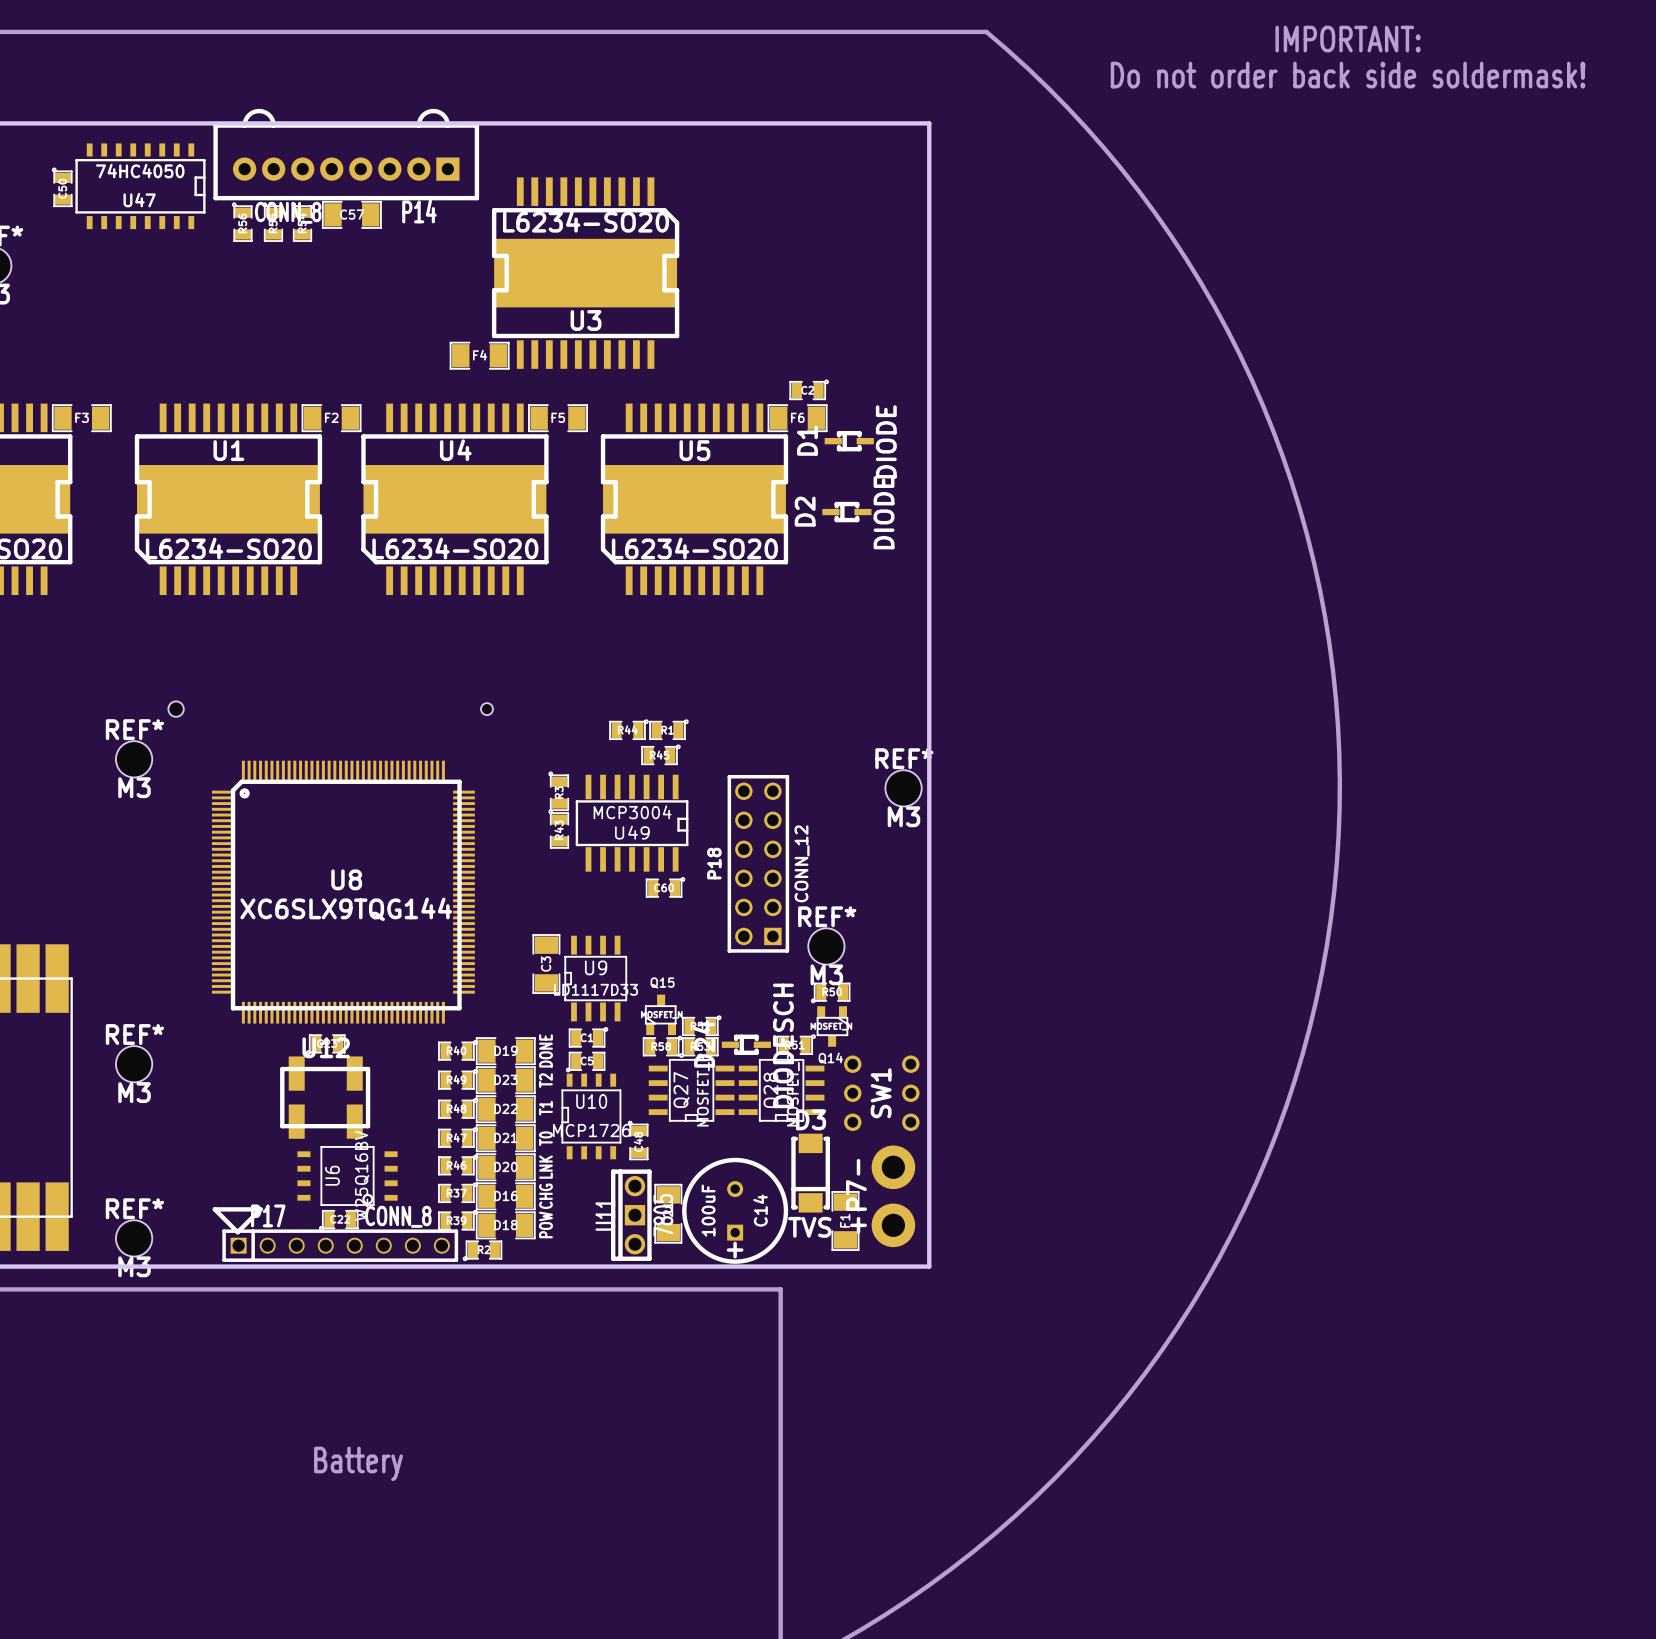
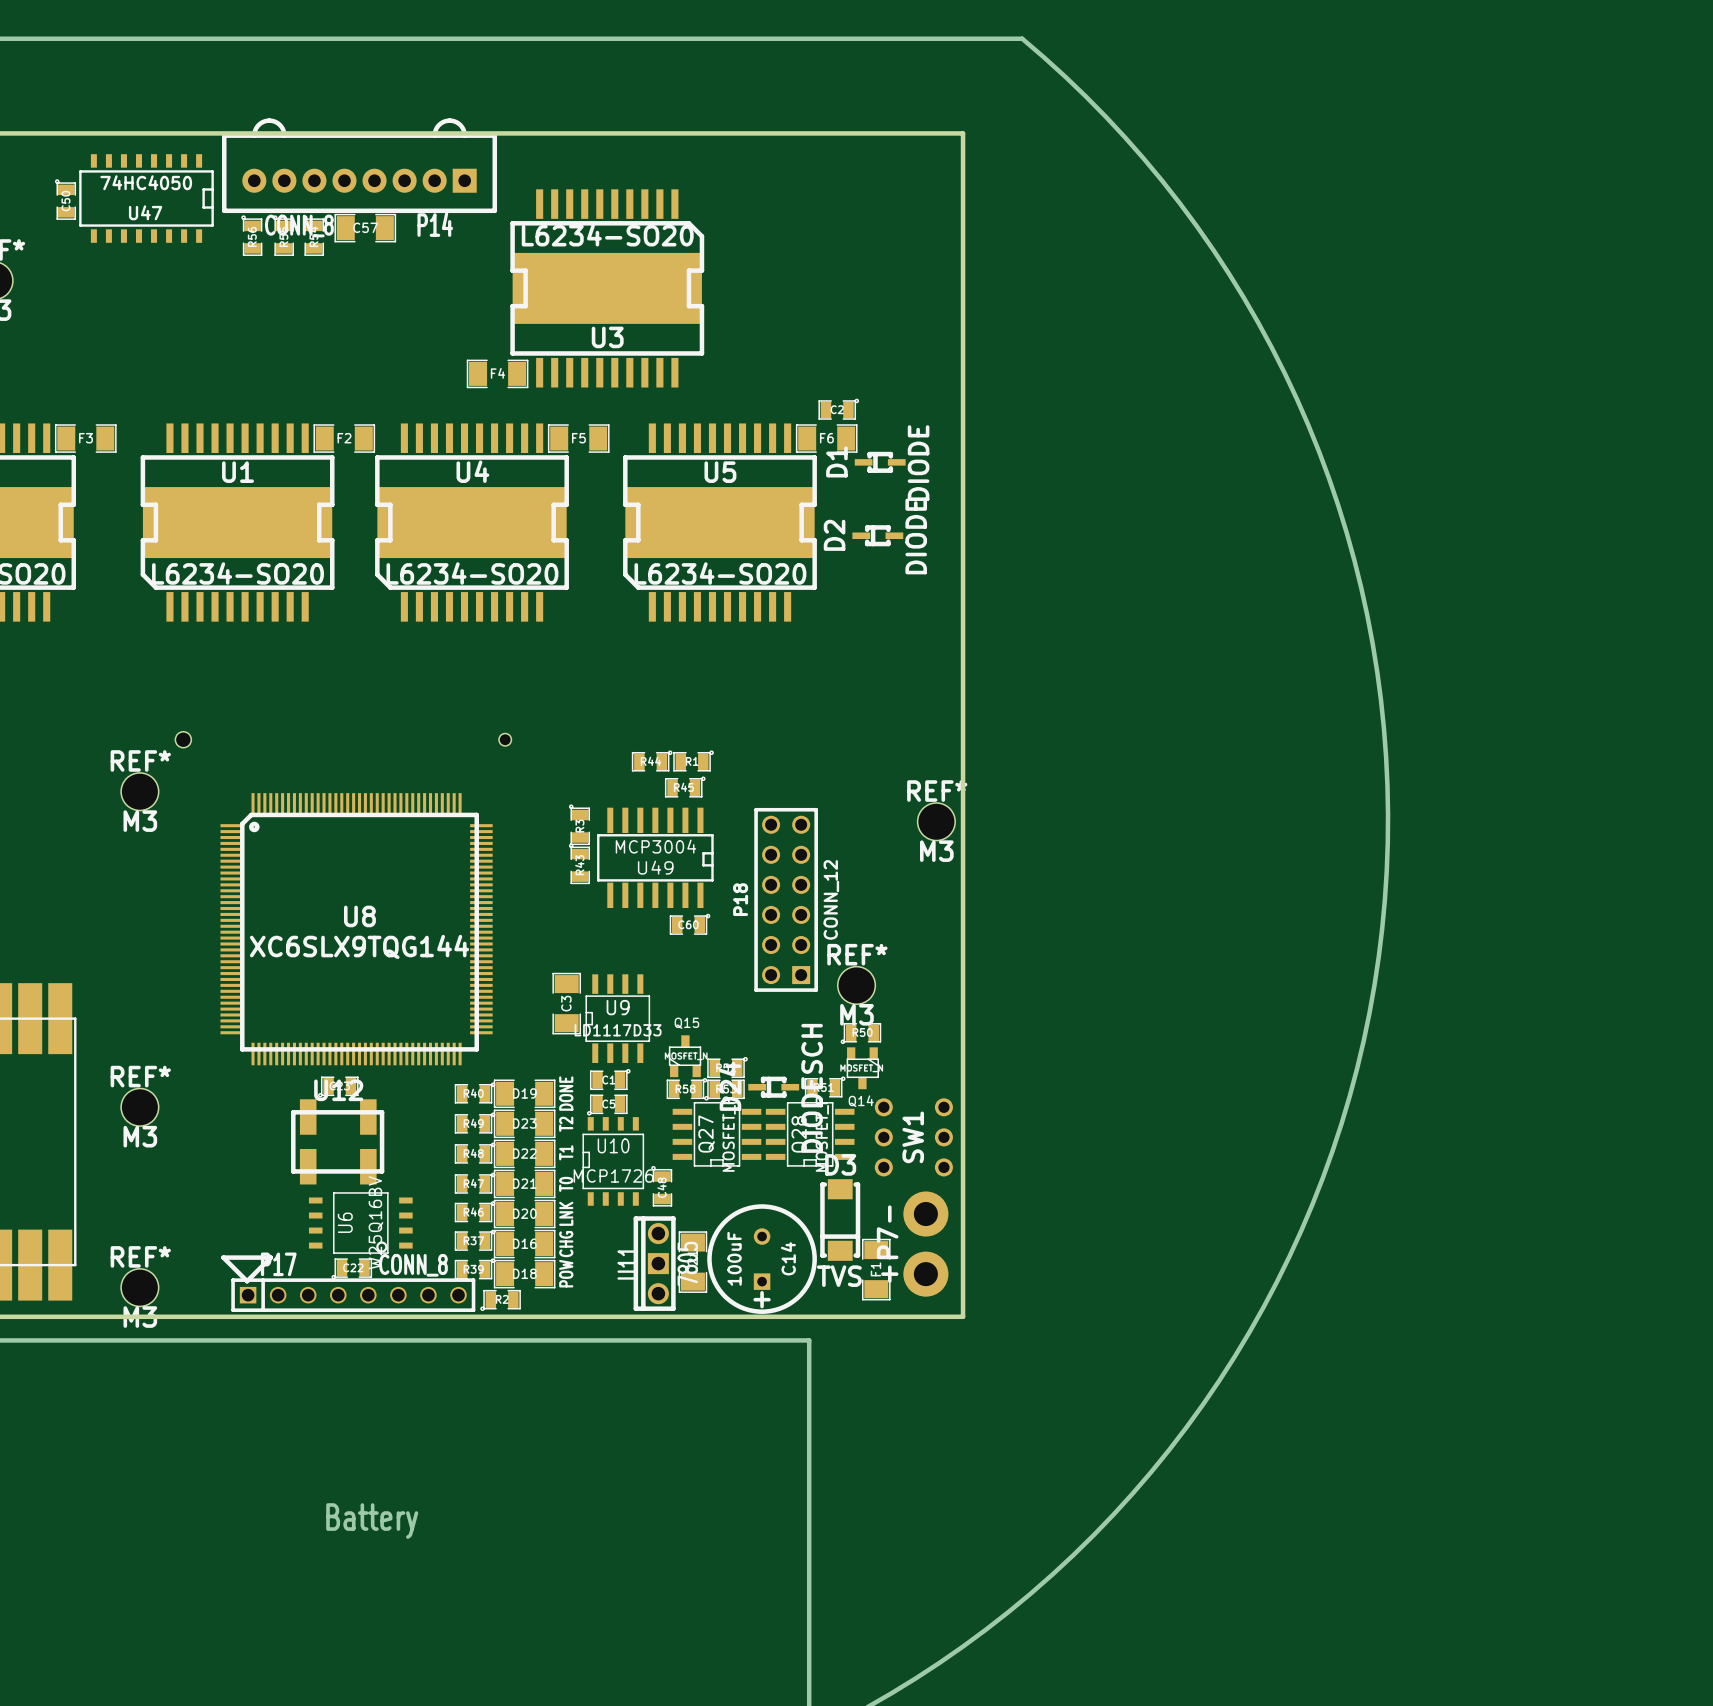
text: IMPORTANT: (1348, 39) -> none
text: Do not order back side soldermask! (1348, 75) -> none

